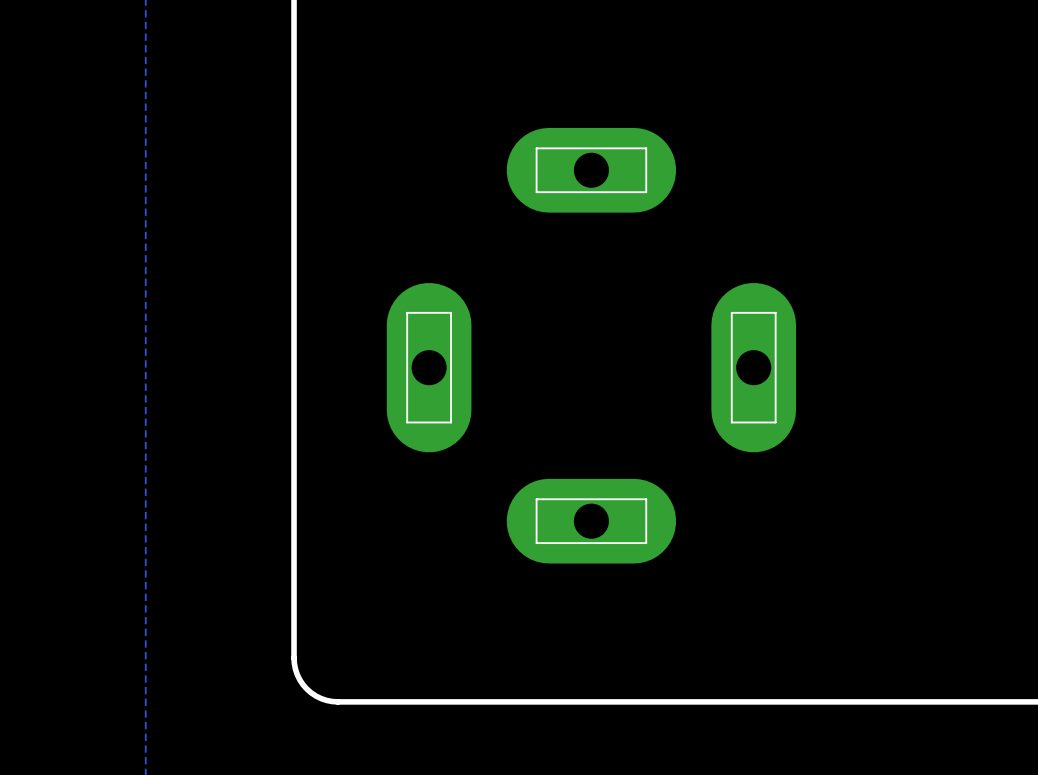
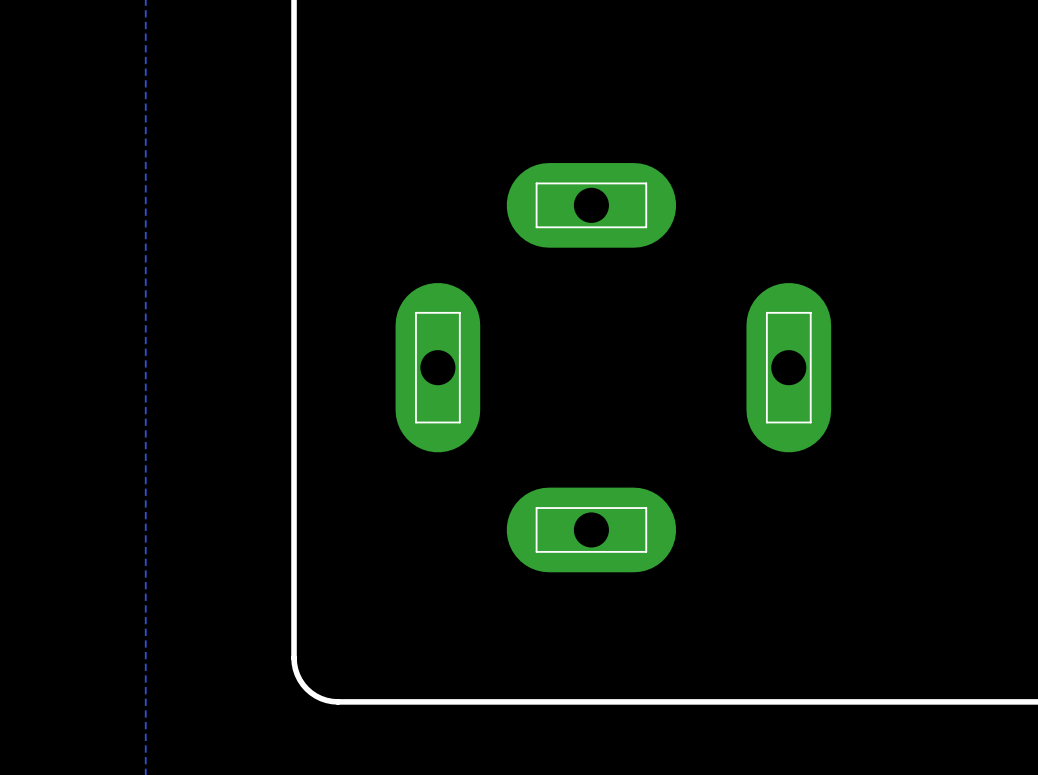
part rotation: 0° (591, 345) -> 90° clockwise (613, 367)

